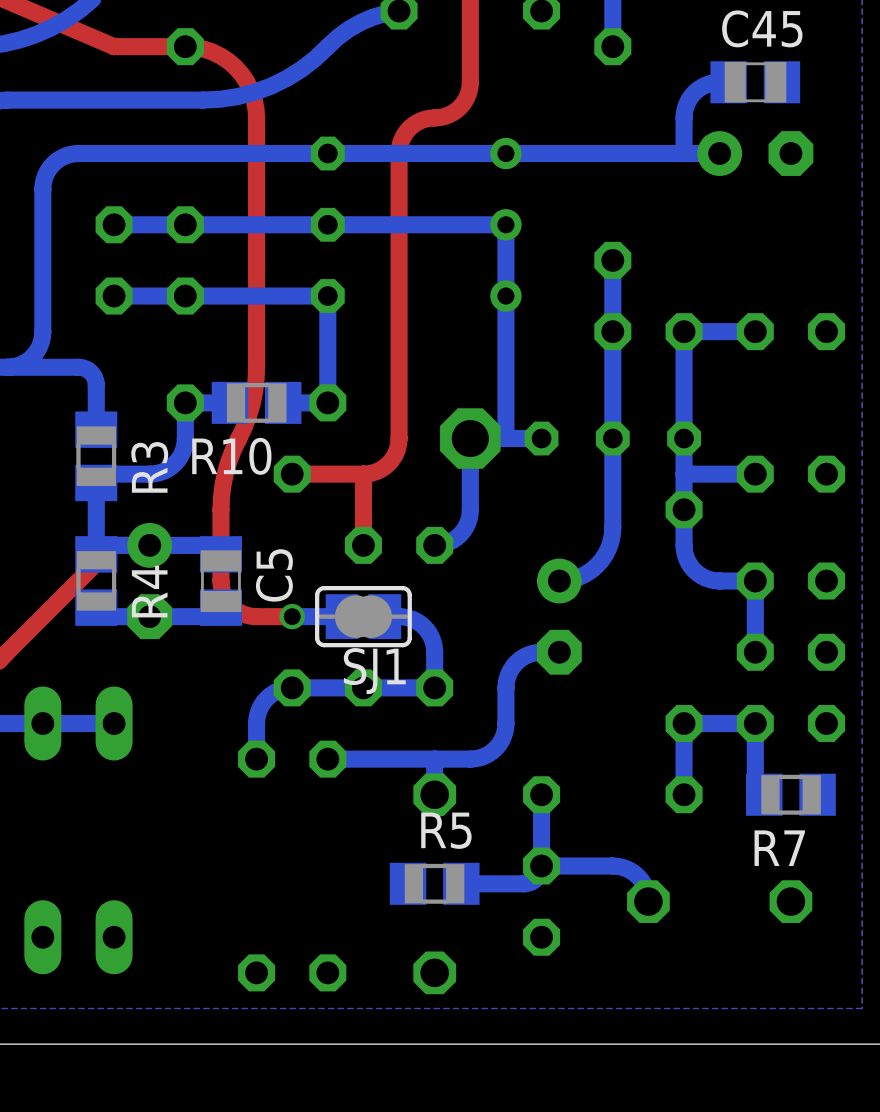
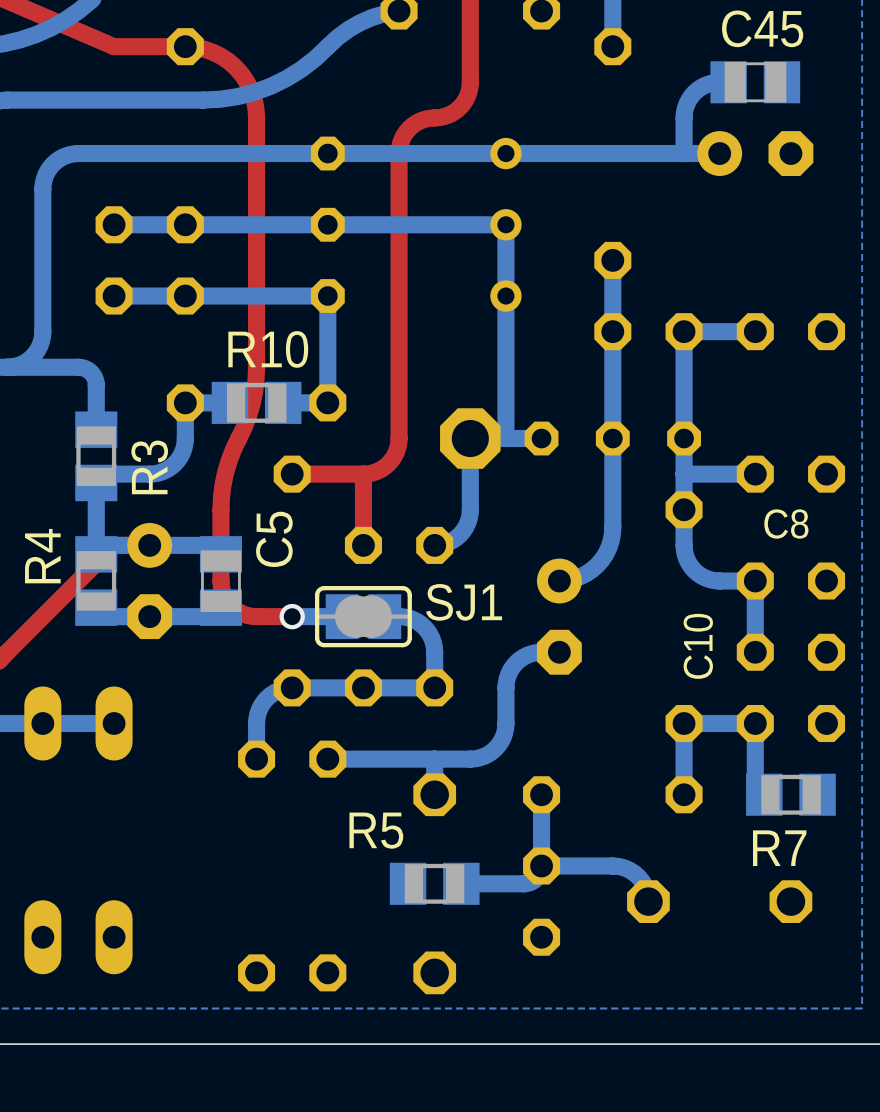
R10 name position: R10 (231, 456) -> R10 (268, 349)
C8 name: none -> C8 (786, 524)
C5 name position: C5 (274, 575) -> C5 (274, 539)
R4 name position: R4 (149, 591) -> R4 (42, 556)
C10 name: none -> C10 (698, 646)
SJ1 name position: SJ1 (374, 671) -> SJ1 (464, 602)
R5 name position: R5 (446, 830) -> R5 (376, 830)

